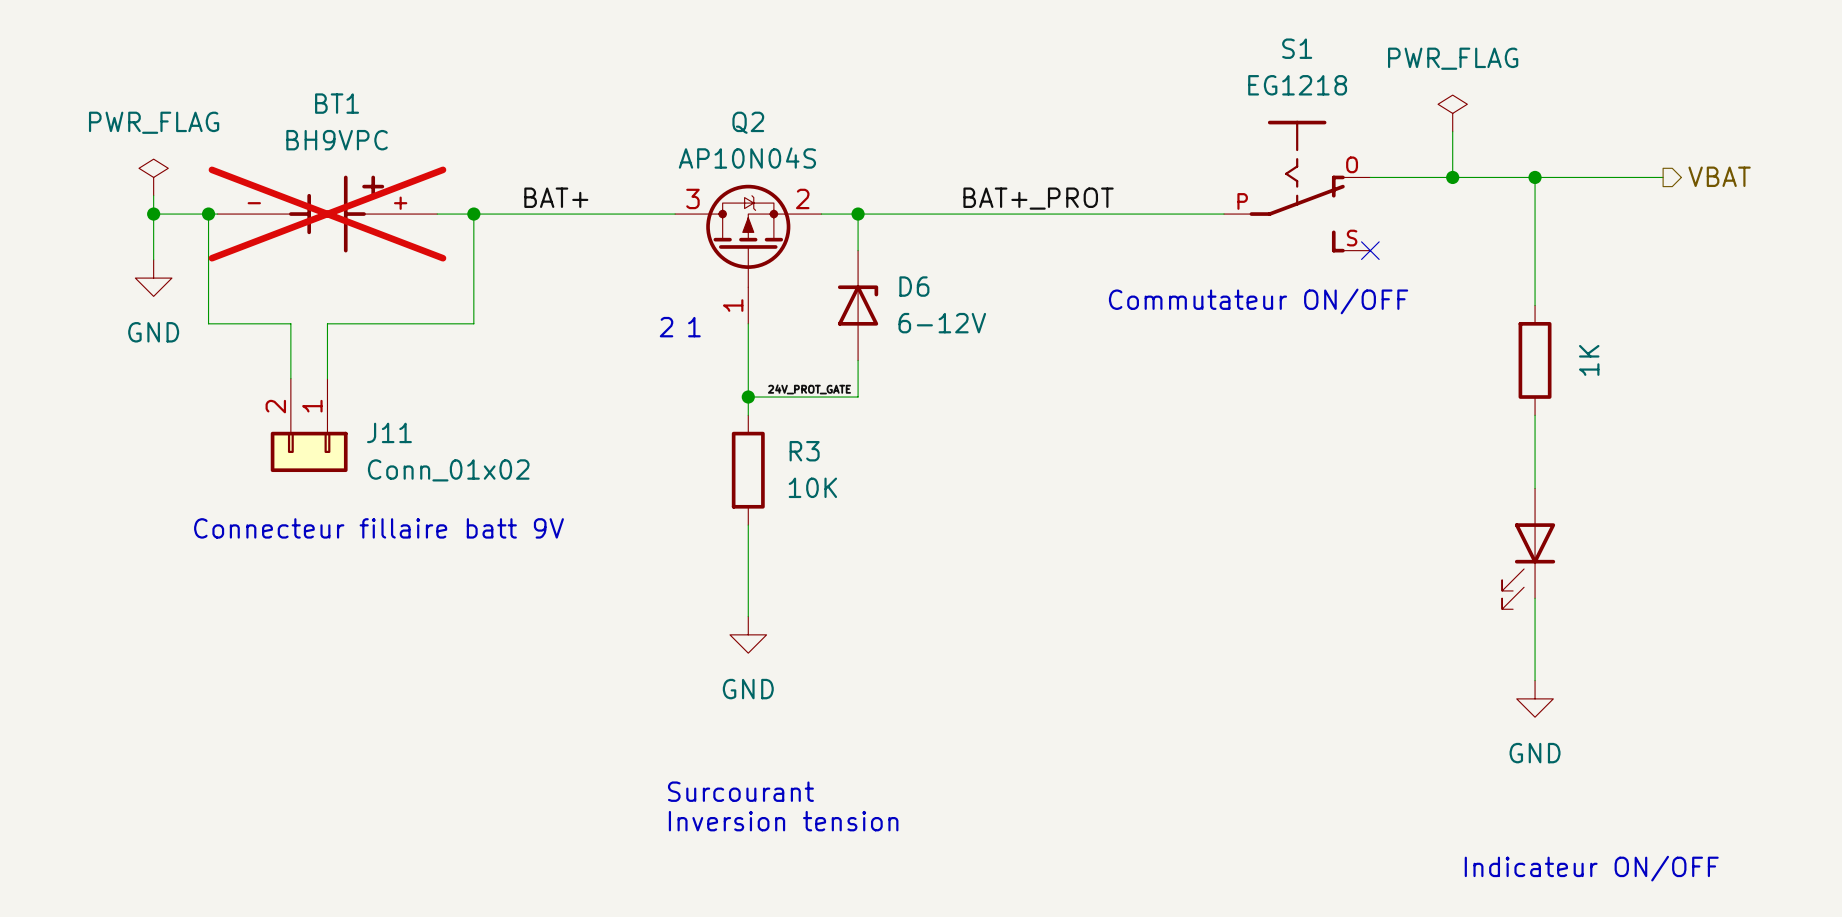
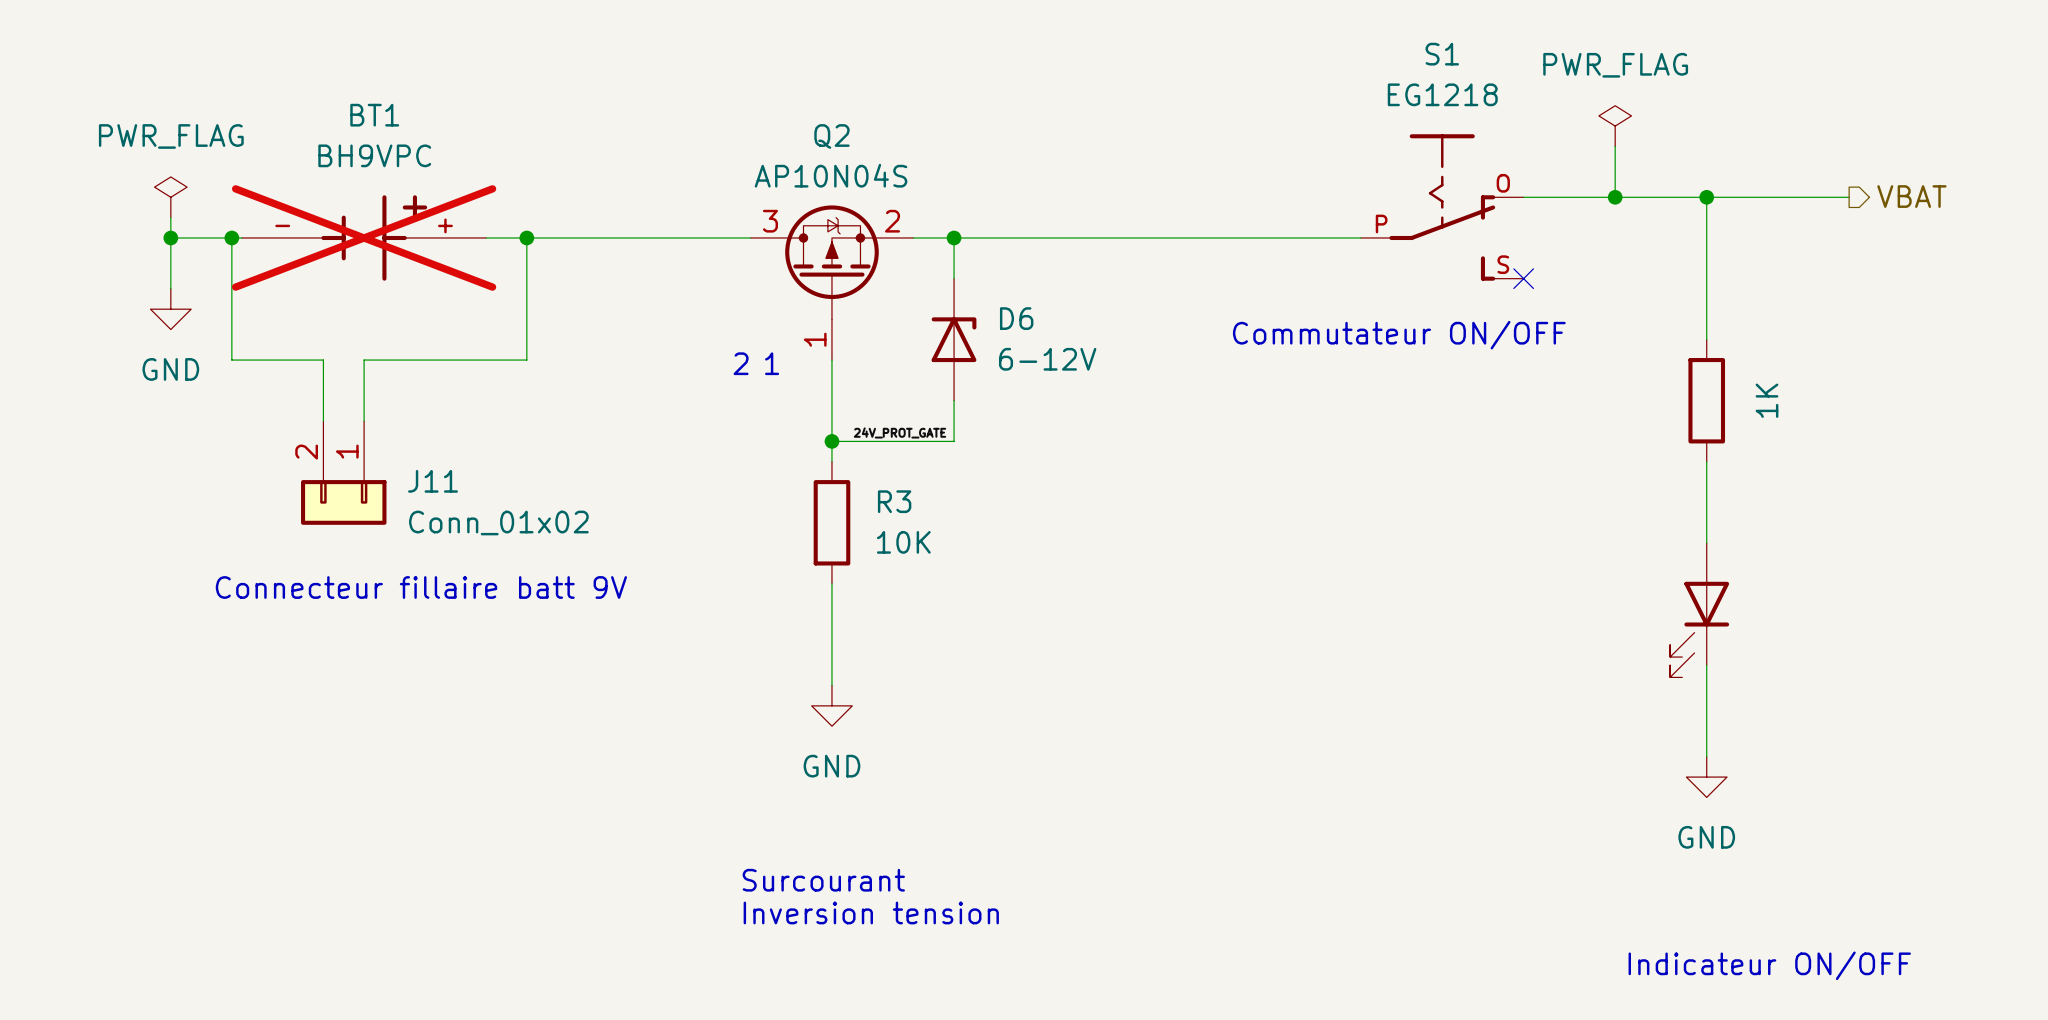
label: BAT+ (556, 197) -> none
label: BAT+_PROT (1038, 198) -> none

